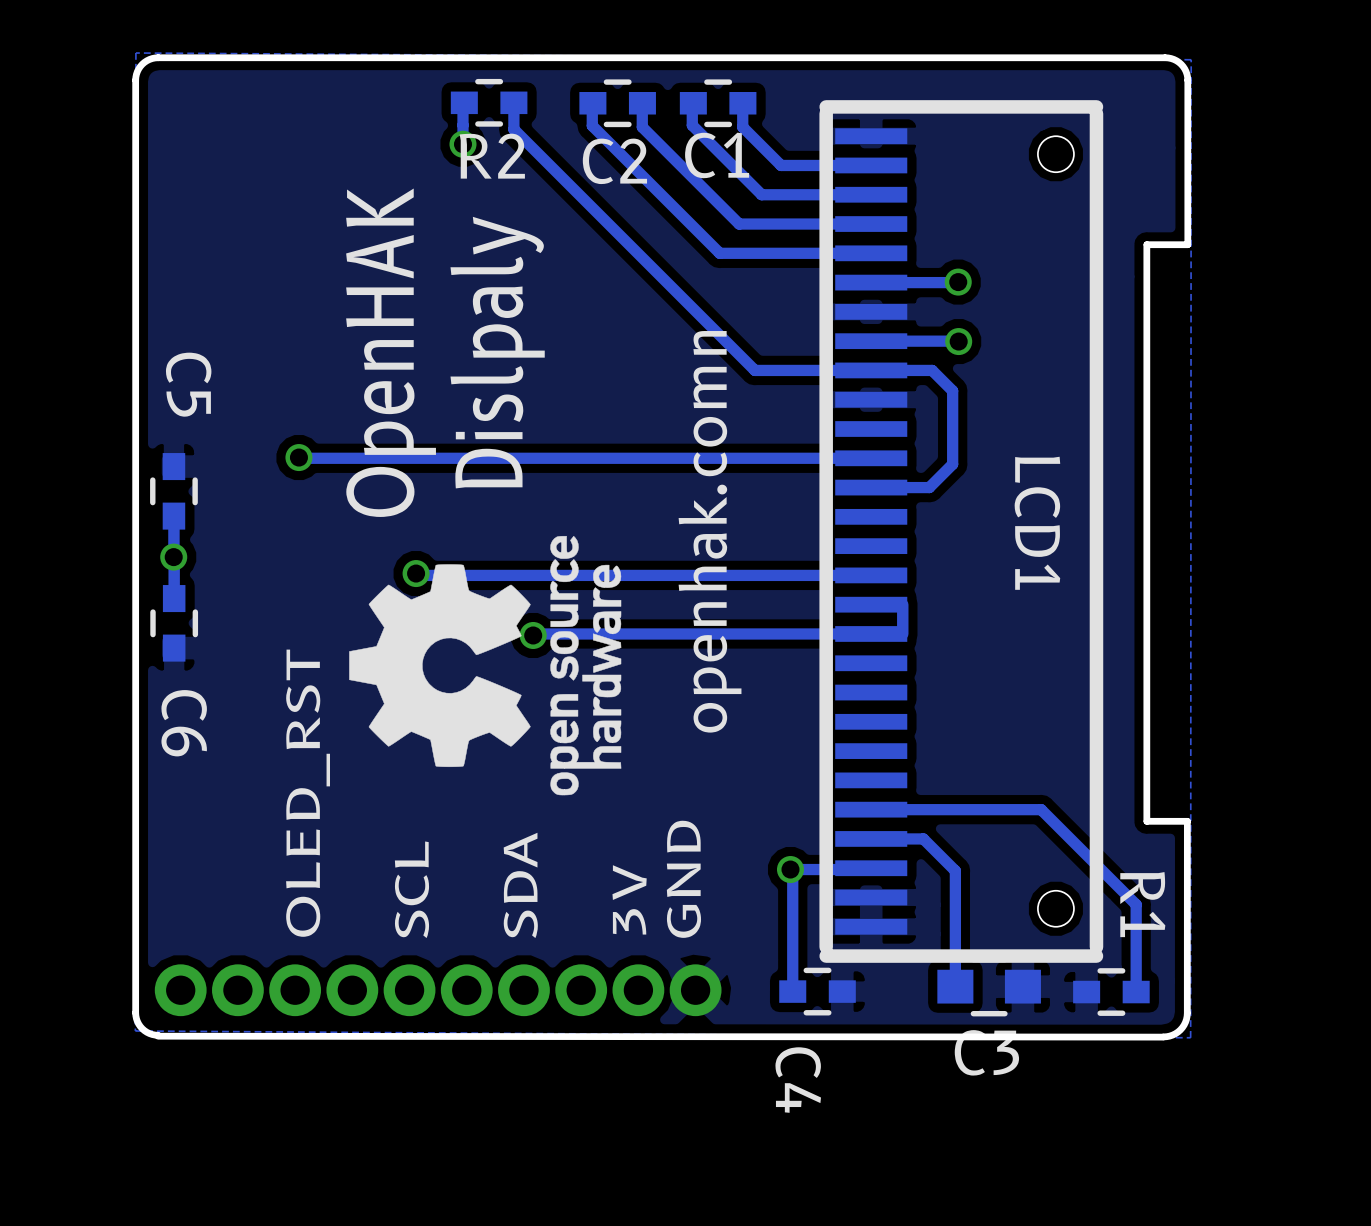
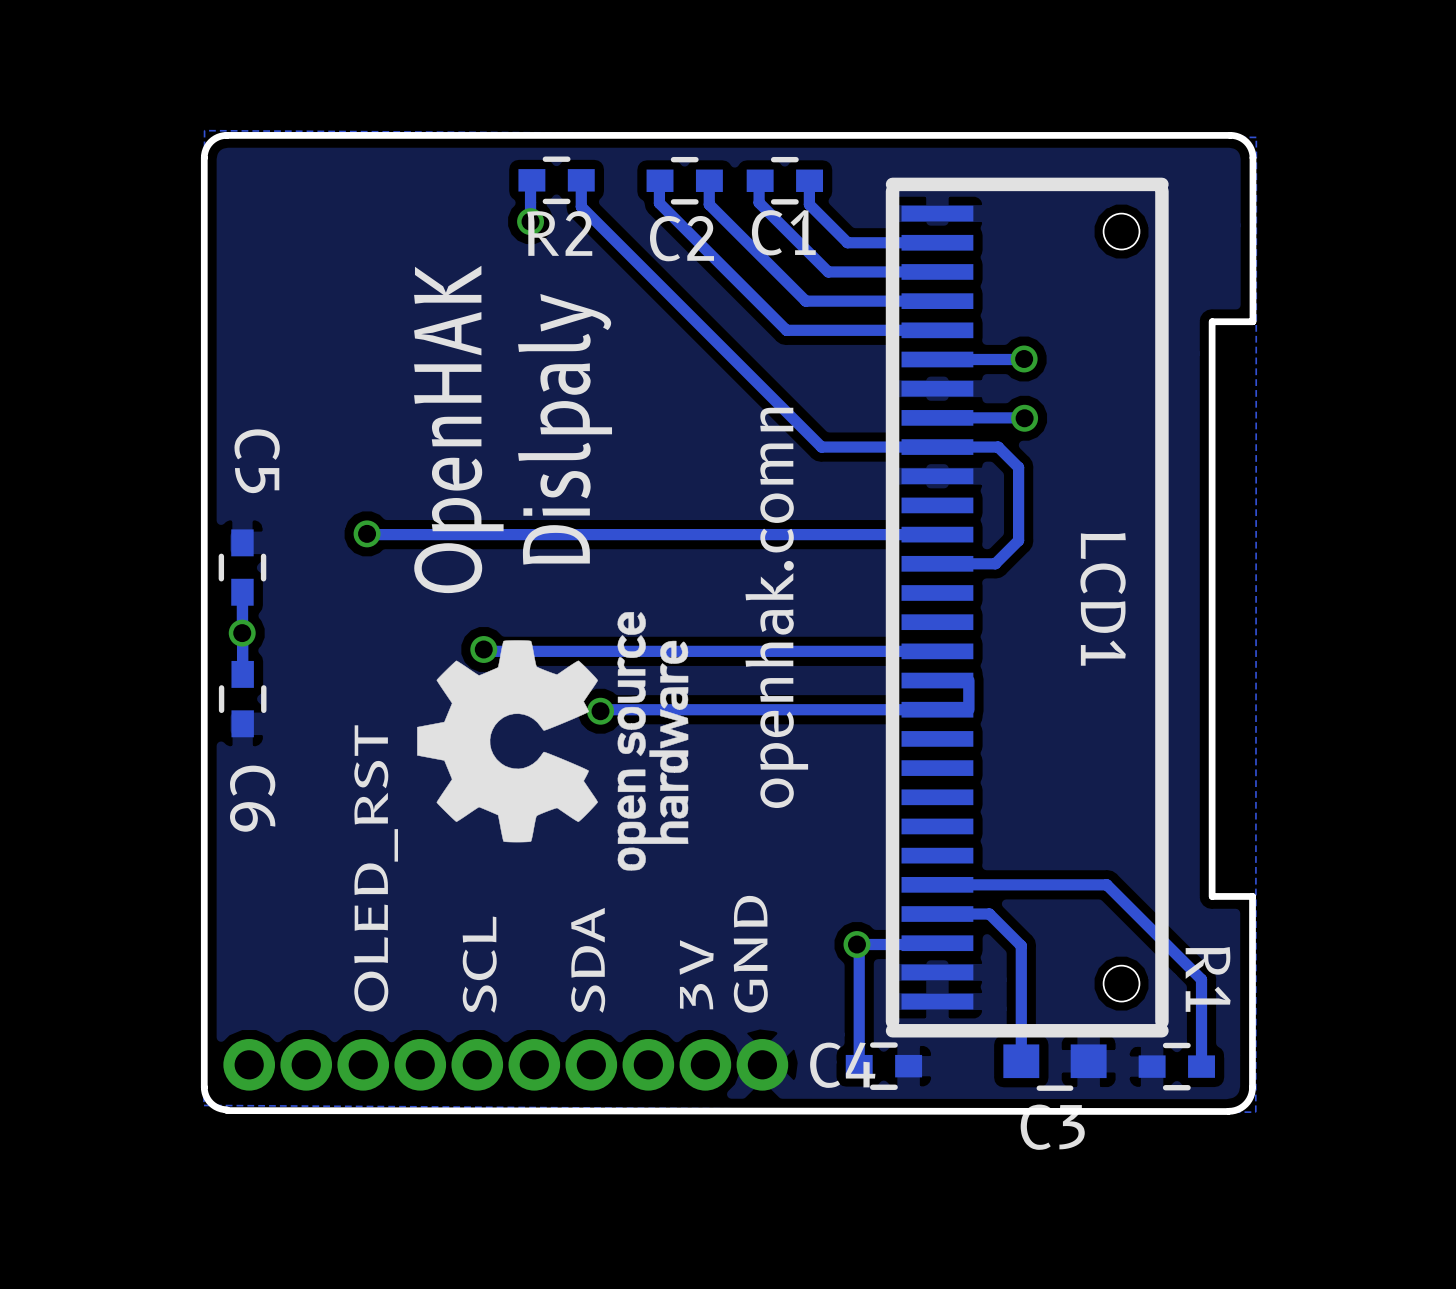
C4 name rotation: 0° (798, 1080) -> 90° counterclockwise (842, 1065)

